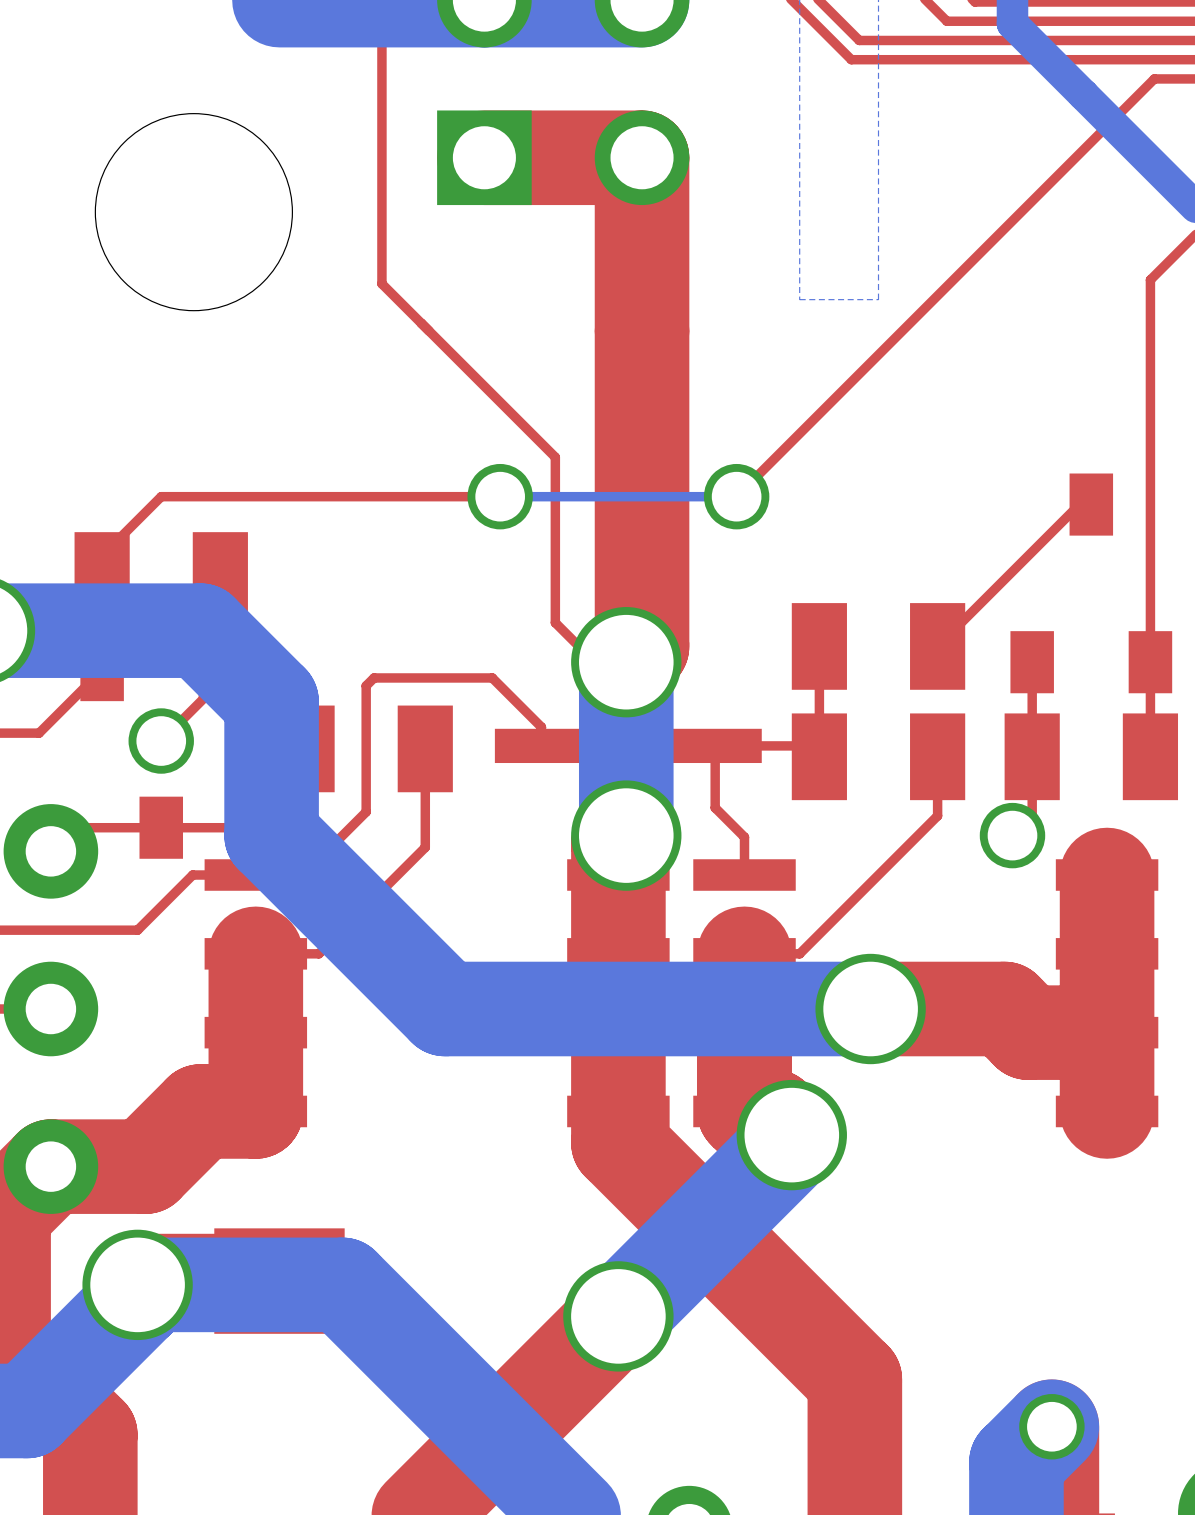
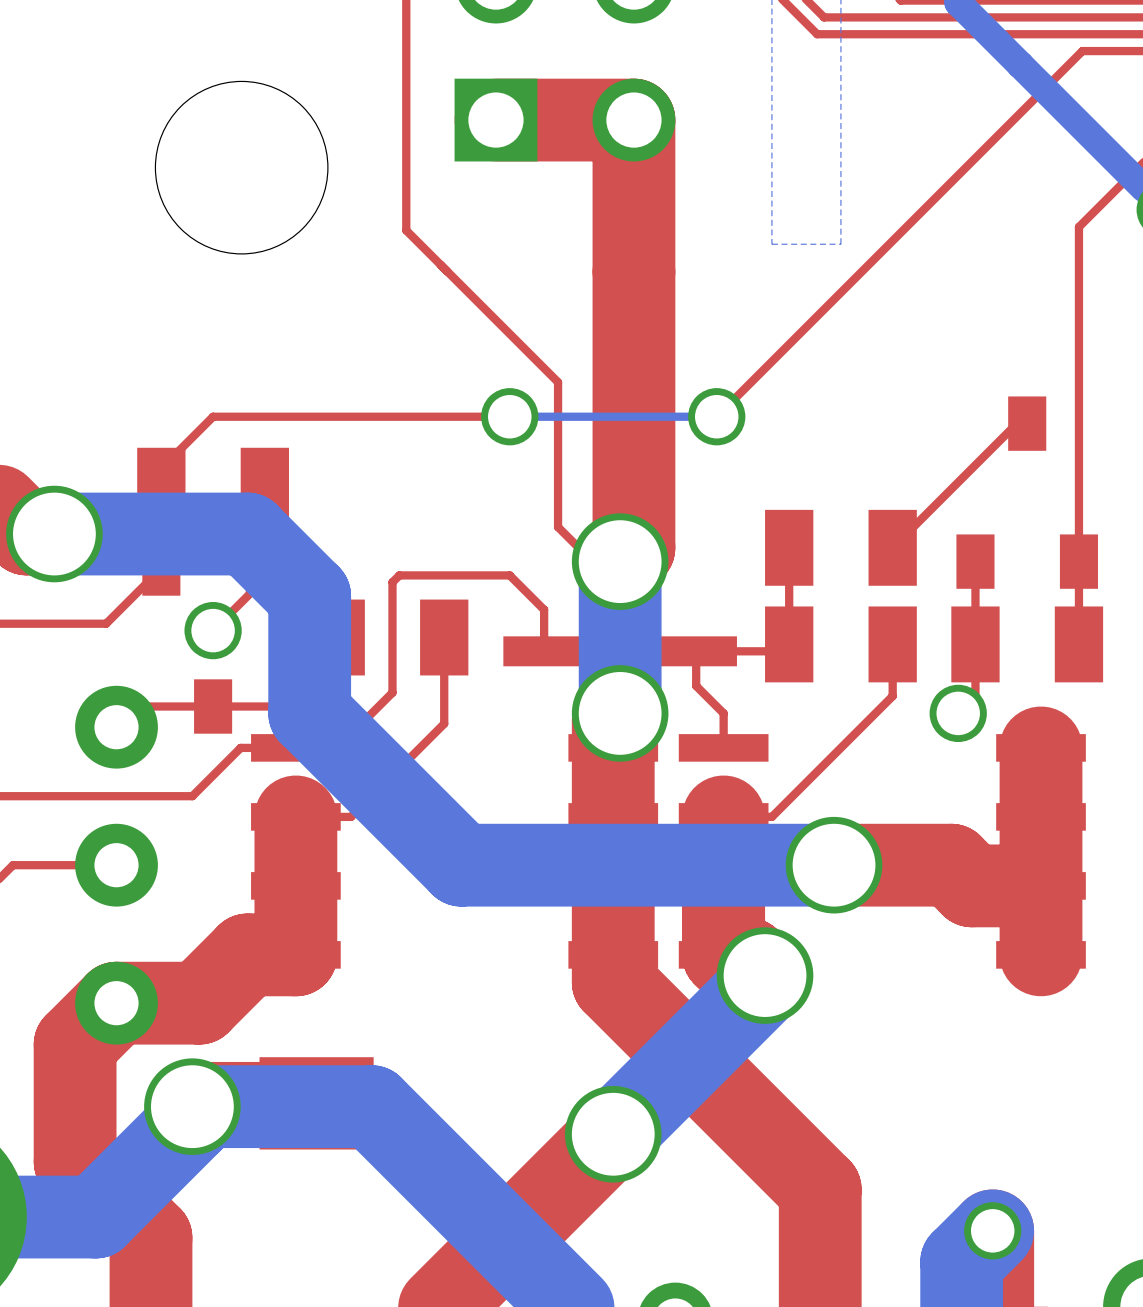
top track: (492, 677) (541, 727) (541, 745) -> (502, 575) (509, 575) (544, 609) (544, 651)
part position: (628, 745) -> (620, 651)
top track: (819, 756) (808, 745) (715, 745) (715, 807) (744, 837) -> (782, 651) (696, 651) (696, 685) (723, 714)

